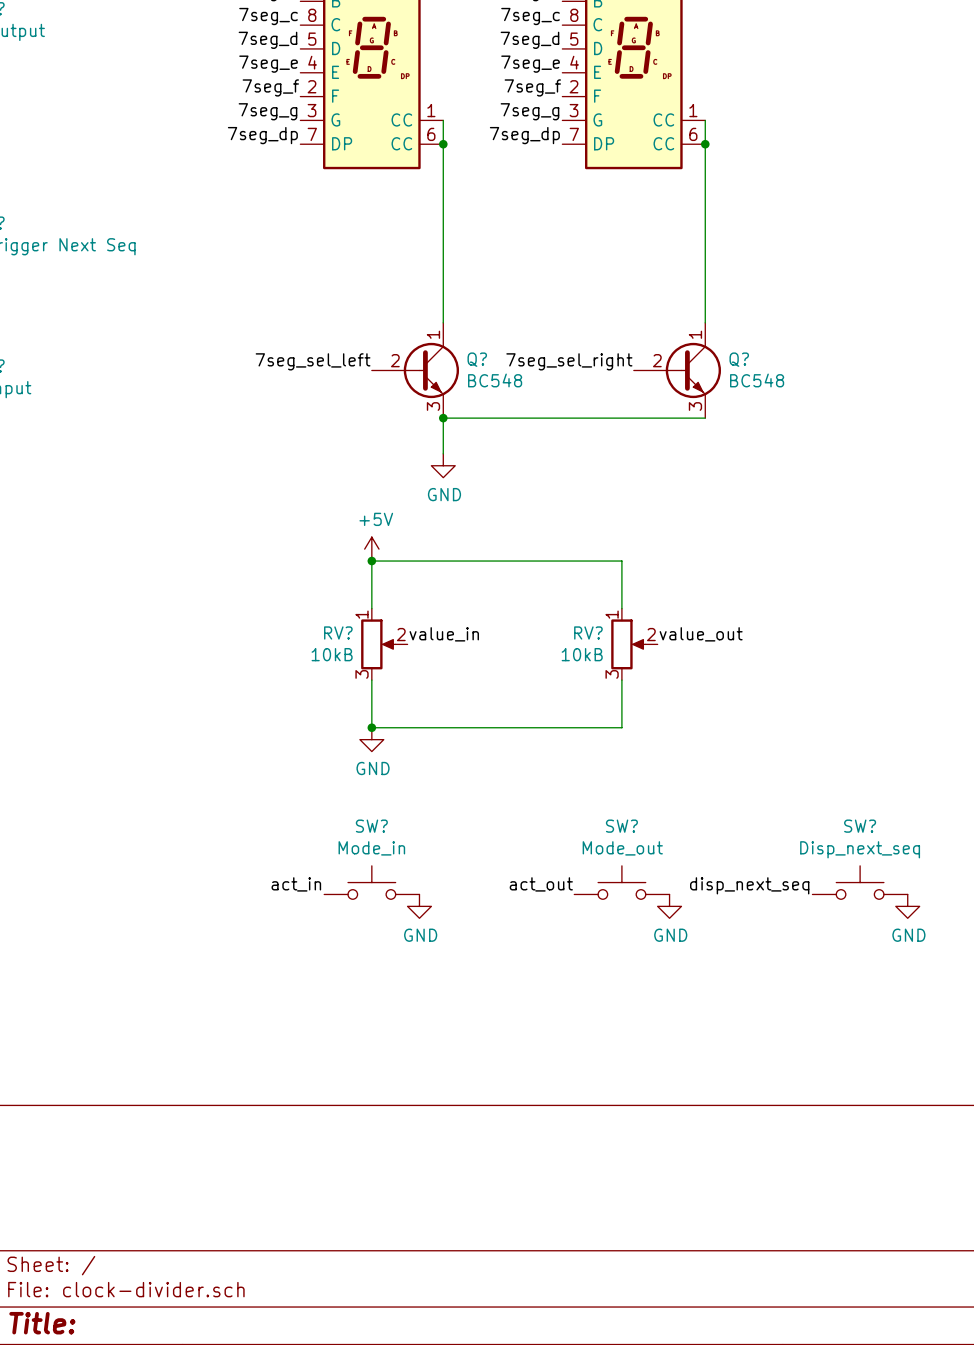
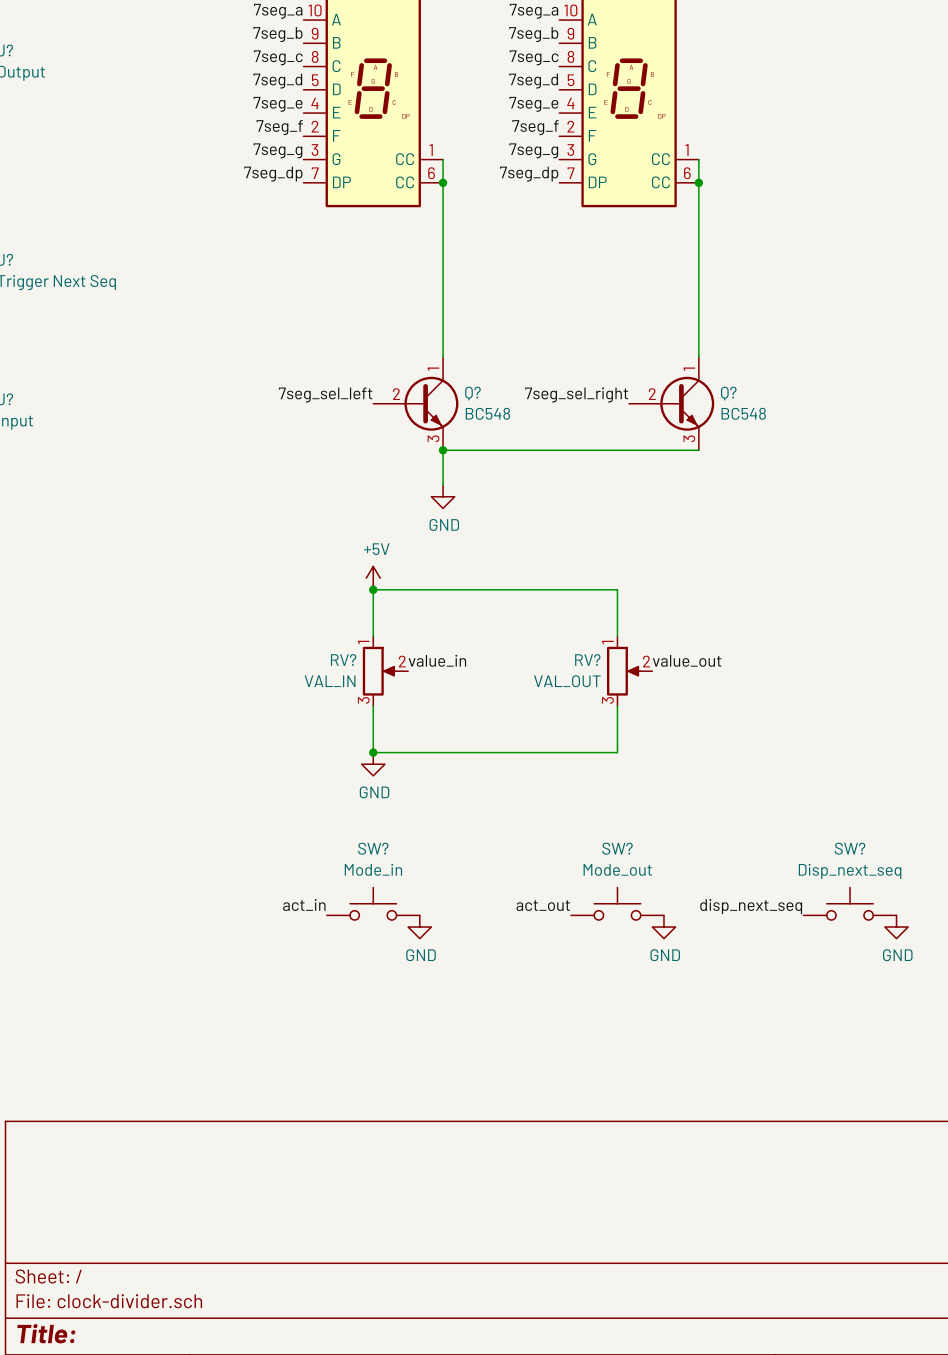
RV? value: 10kB (332, 654) -> VAL_IN (330, 681)
RV? value: 10kB (582, 654) -> VAL_OUT (567, 681)

